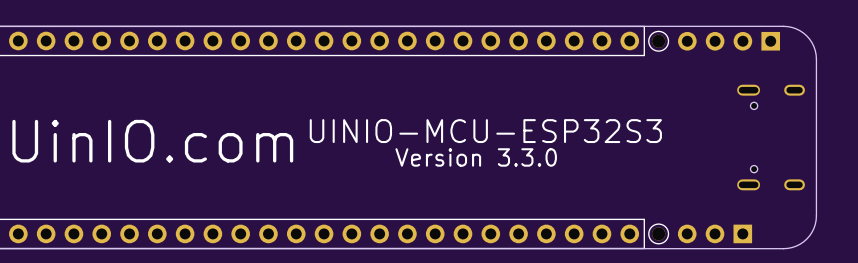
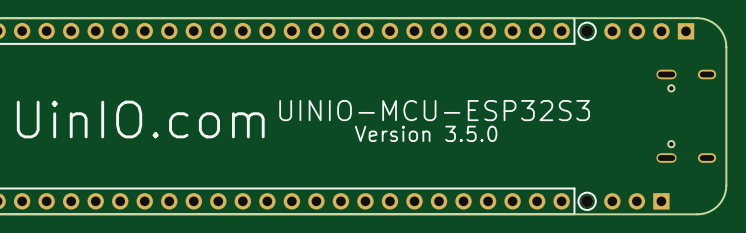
text: Version 3.3.0 (476, 157) -> Version 3.5.0 (426, 133)

